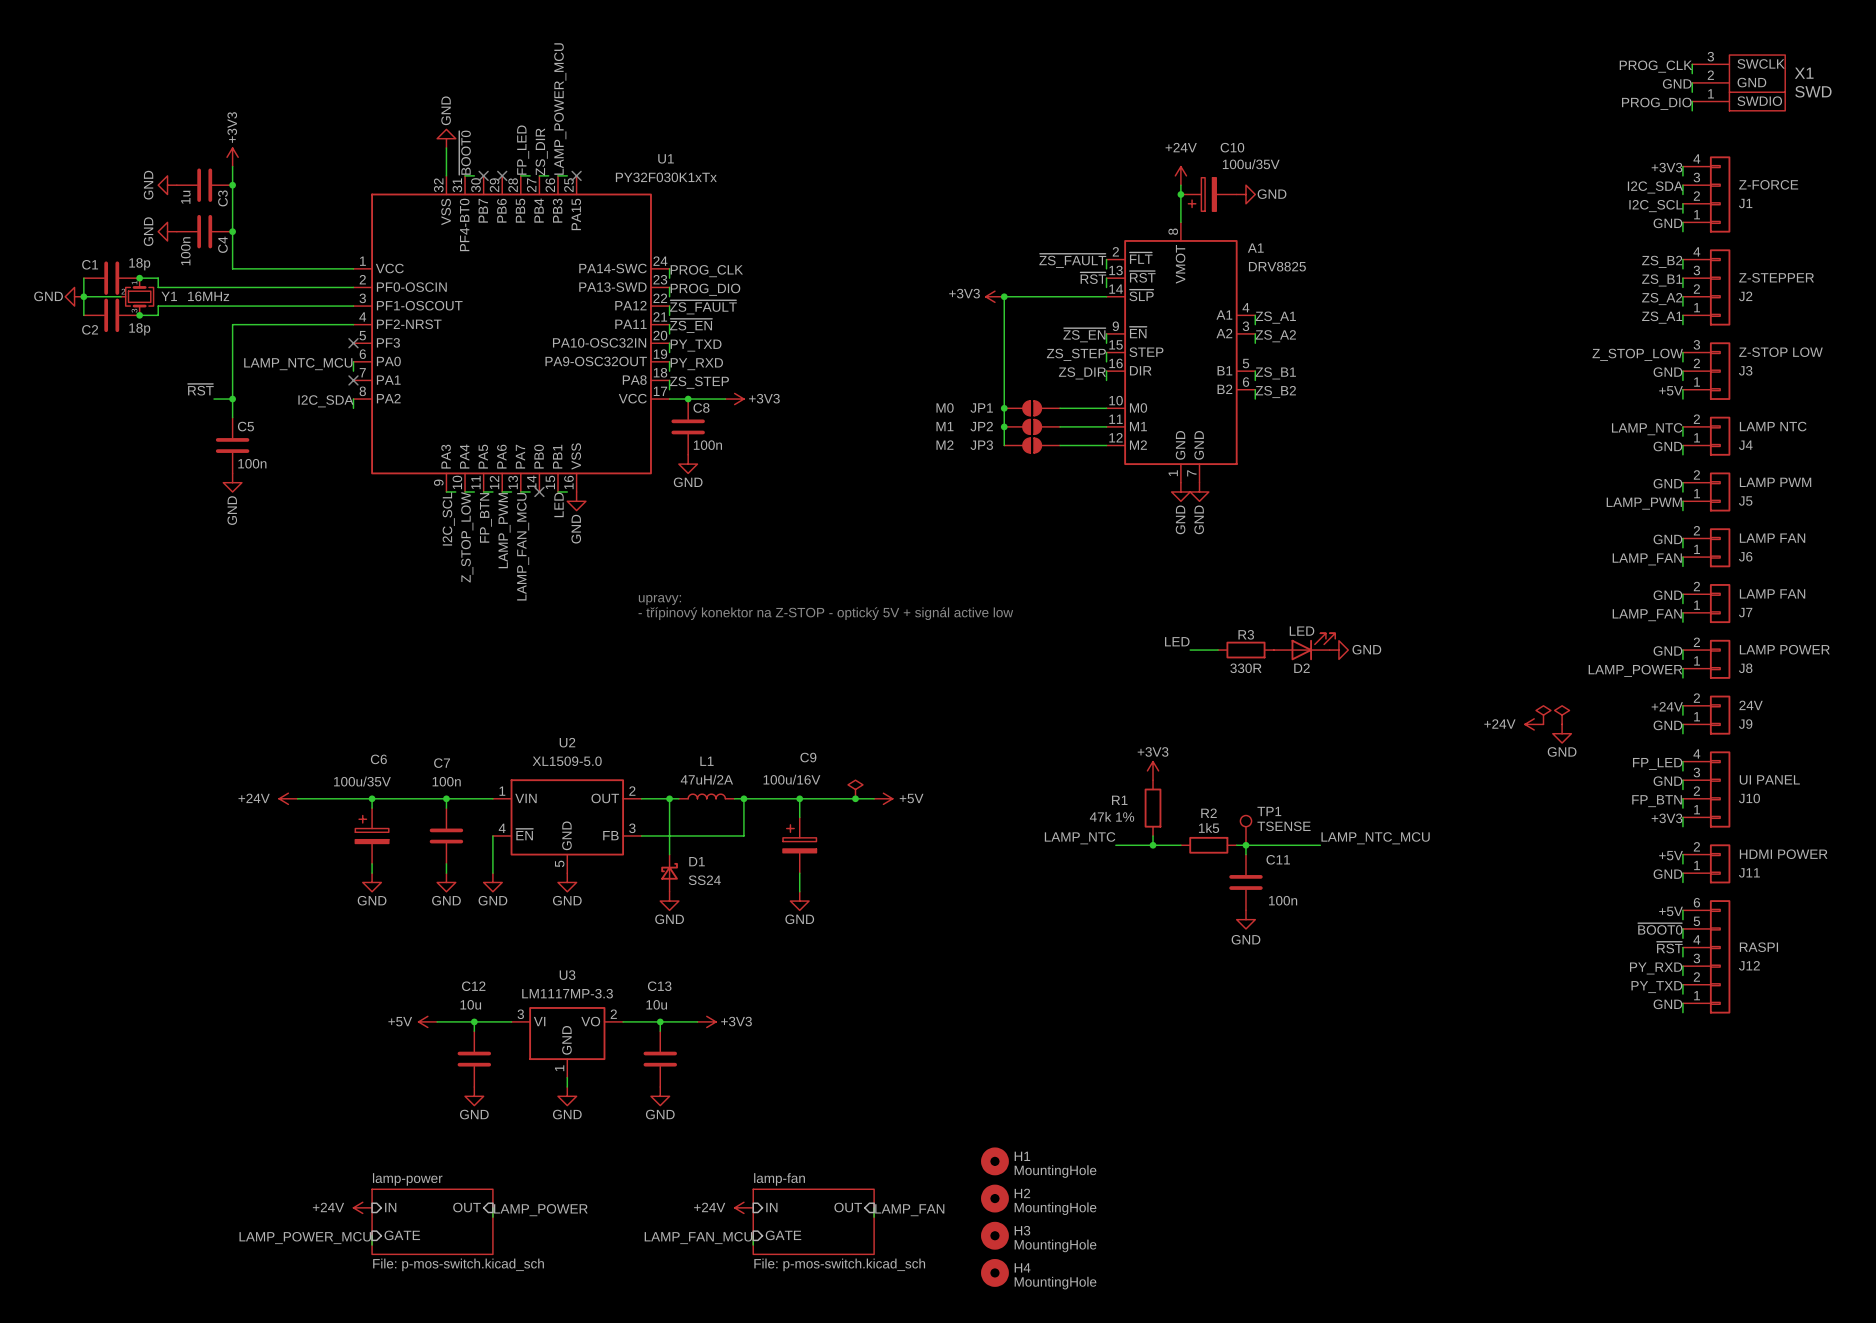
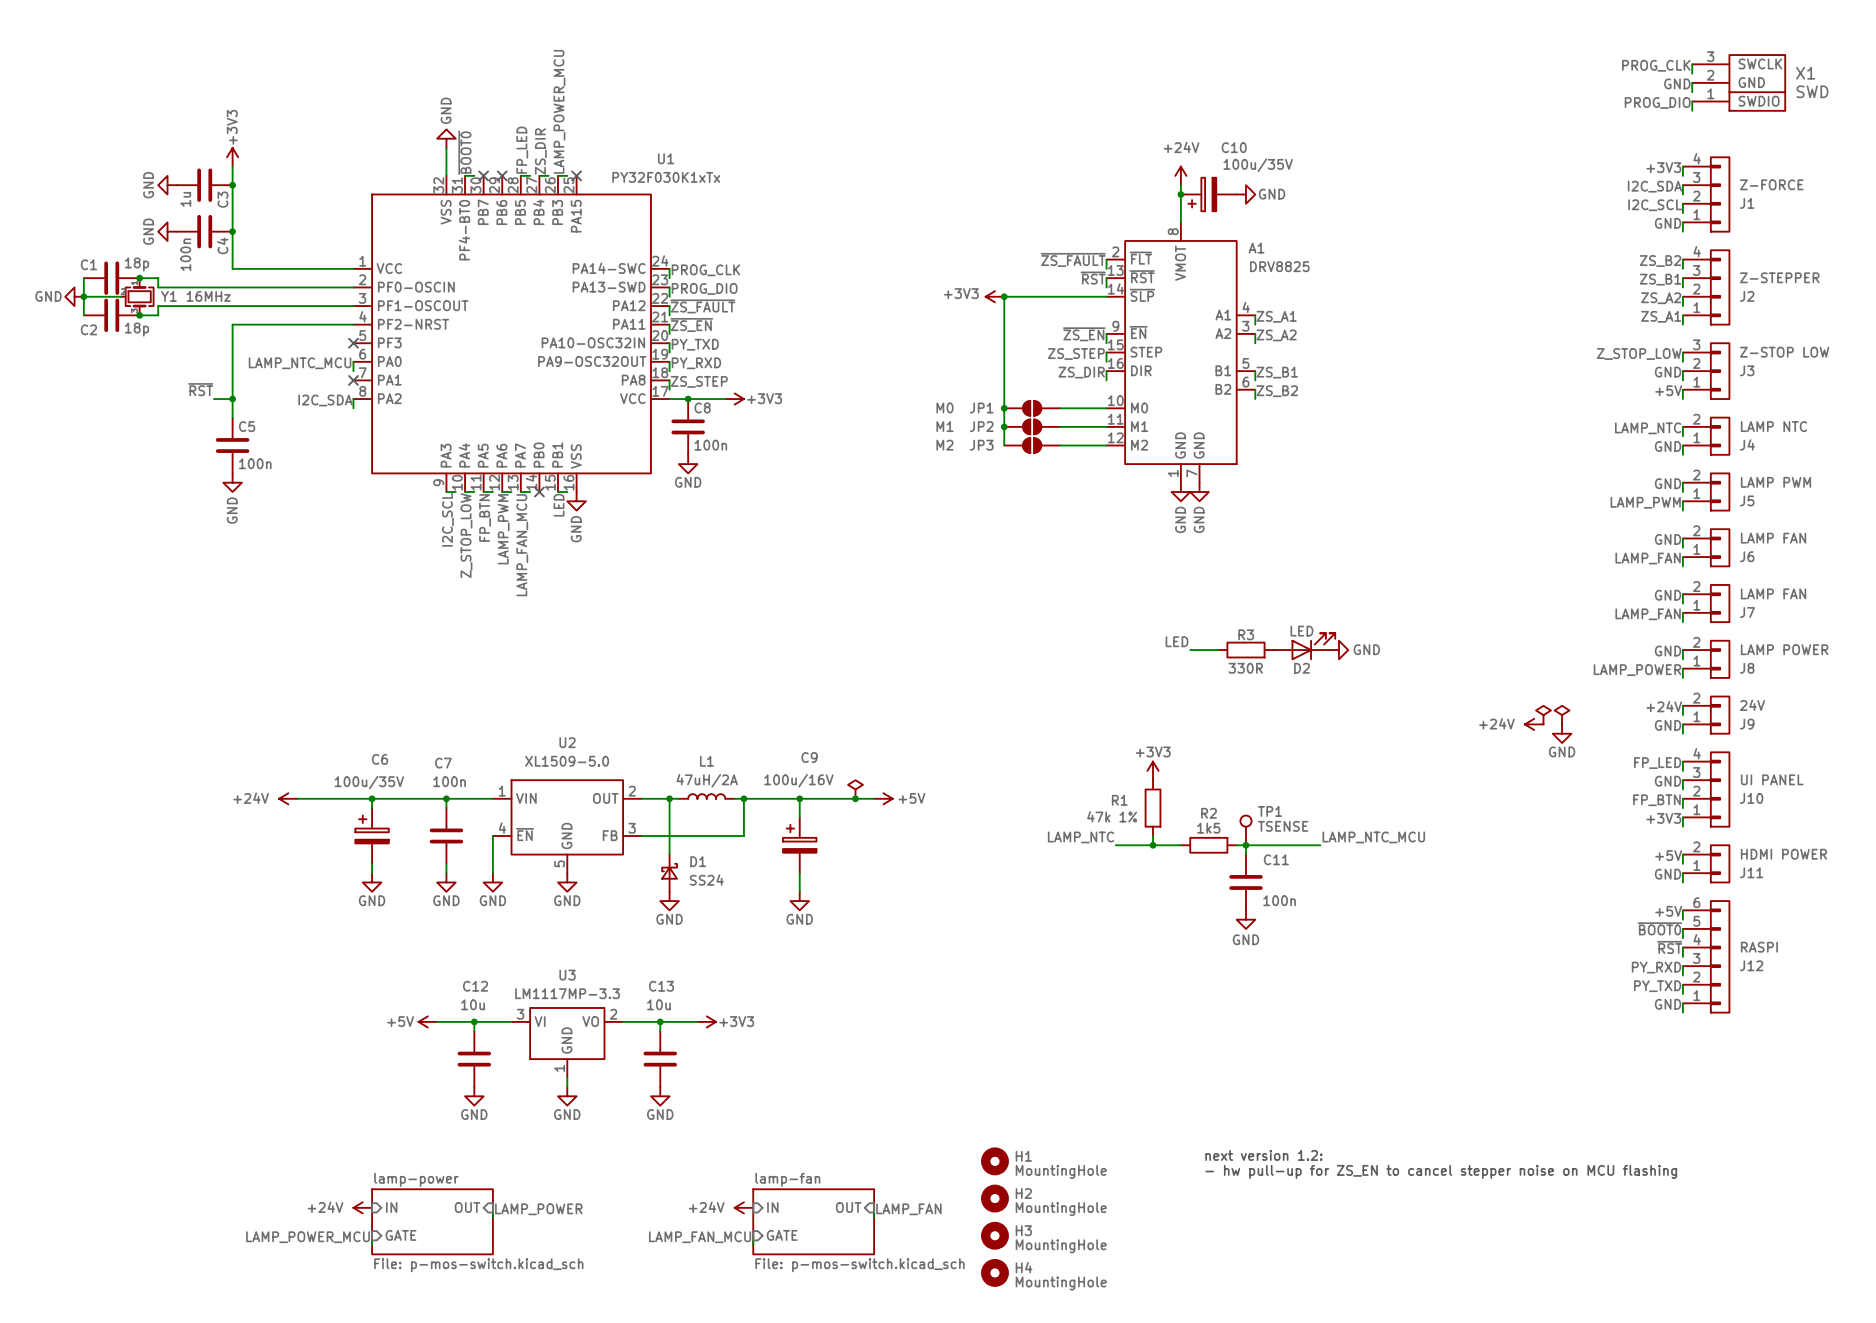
text: upravy: (659, 600) -> none
text: - třípinový konektor na Z-STOP - optický 5V + signál active low (825, 613) -> none
text: none -> next version 1.2: (1263, 1155)
text: none -> - hw pull-up for ZS_EN to cancel stepper noise on MCU flashing (1441, 1171)

